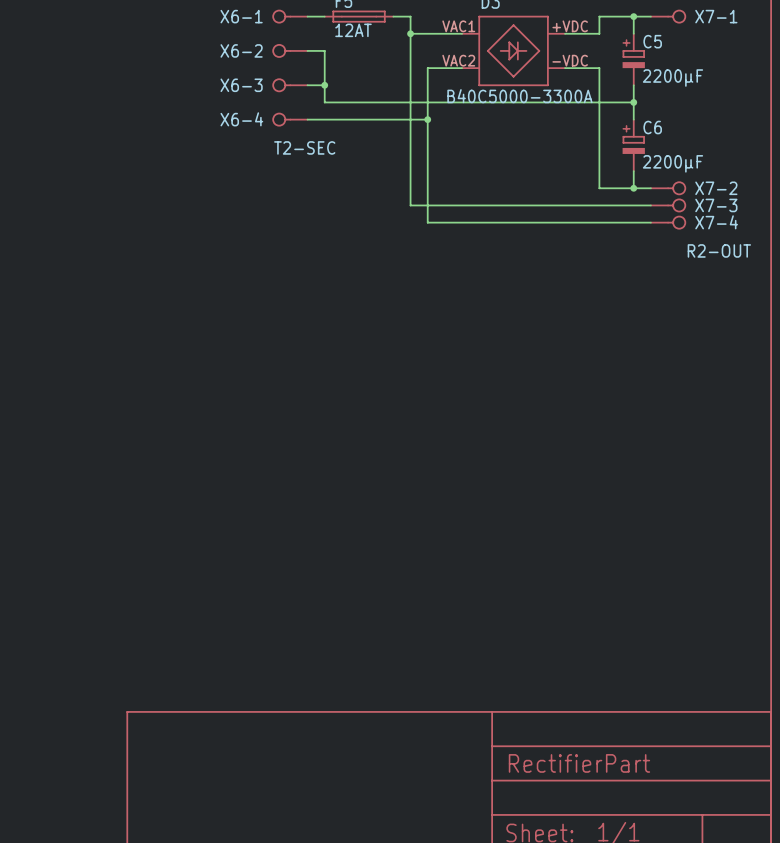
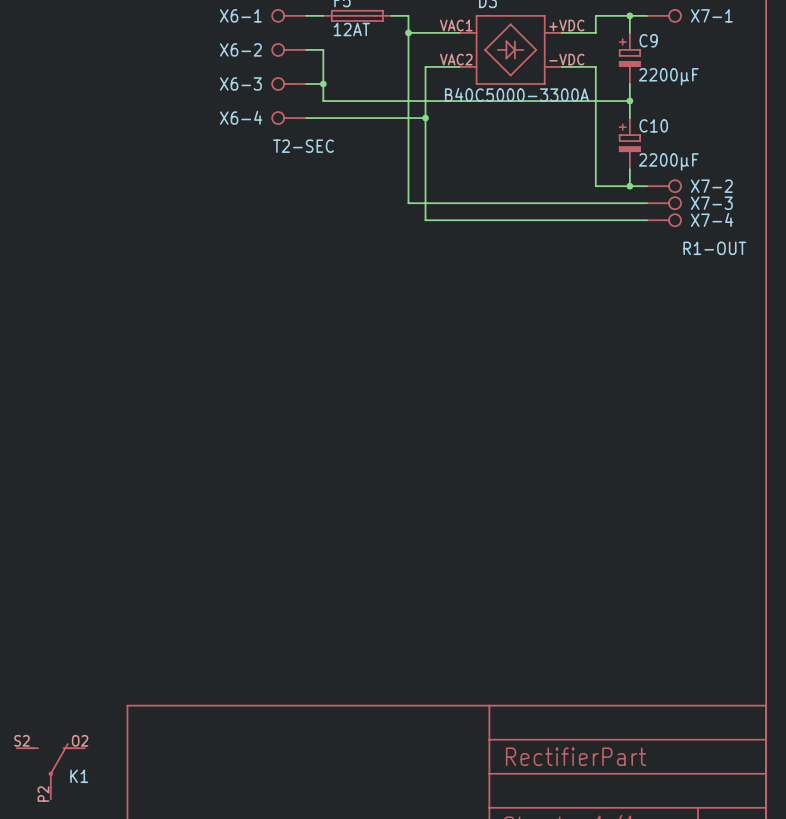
C5 name: C5 (652, 41) -> C9 (648, 40)
C6 name: C6 (652, 127) -> C10 (653, 125)
X7-4 value: R2-OUT (719, 250) -> R1-OUT (714, 248)
K1: none -> (50, 771)

